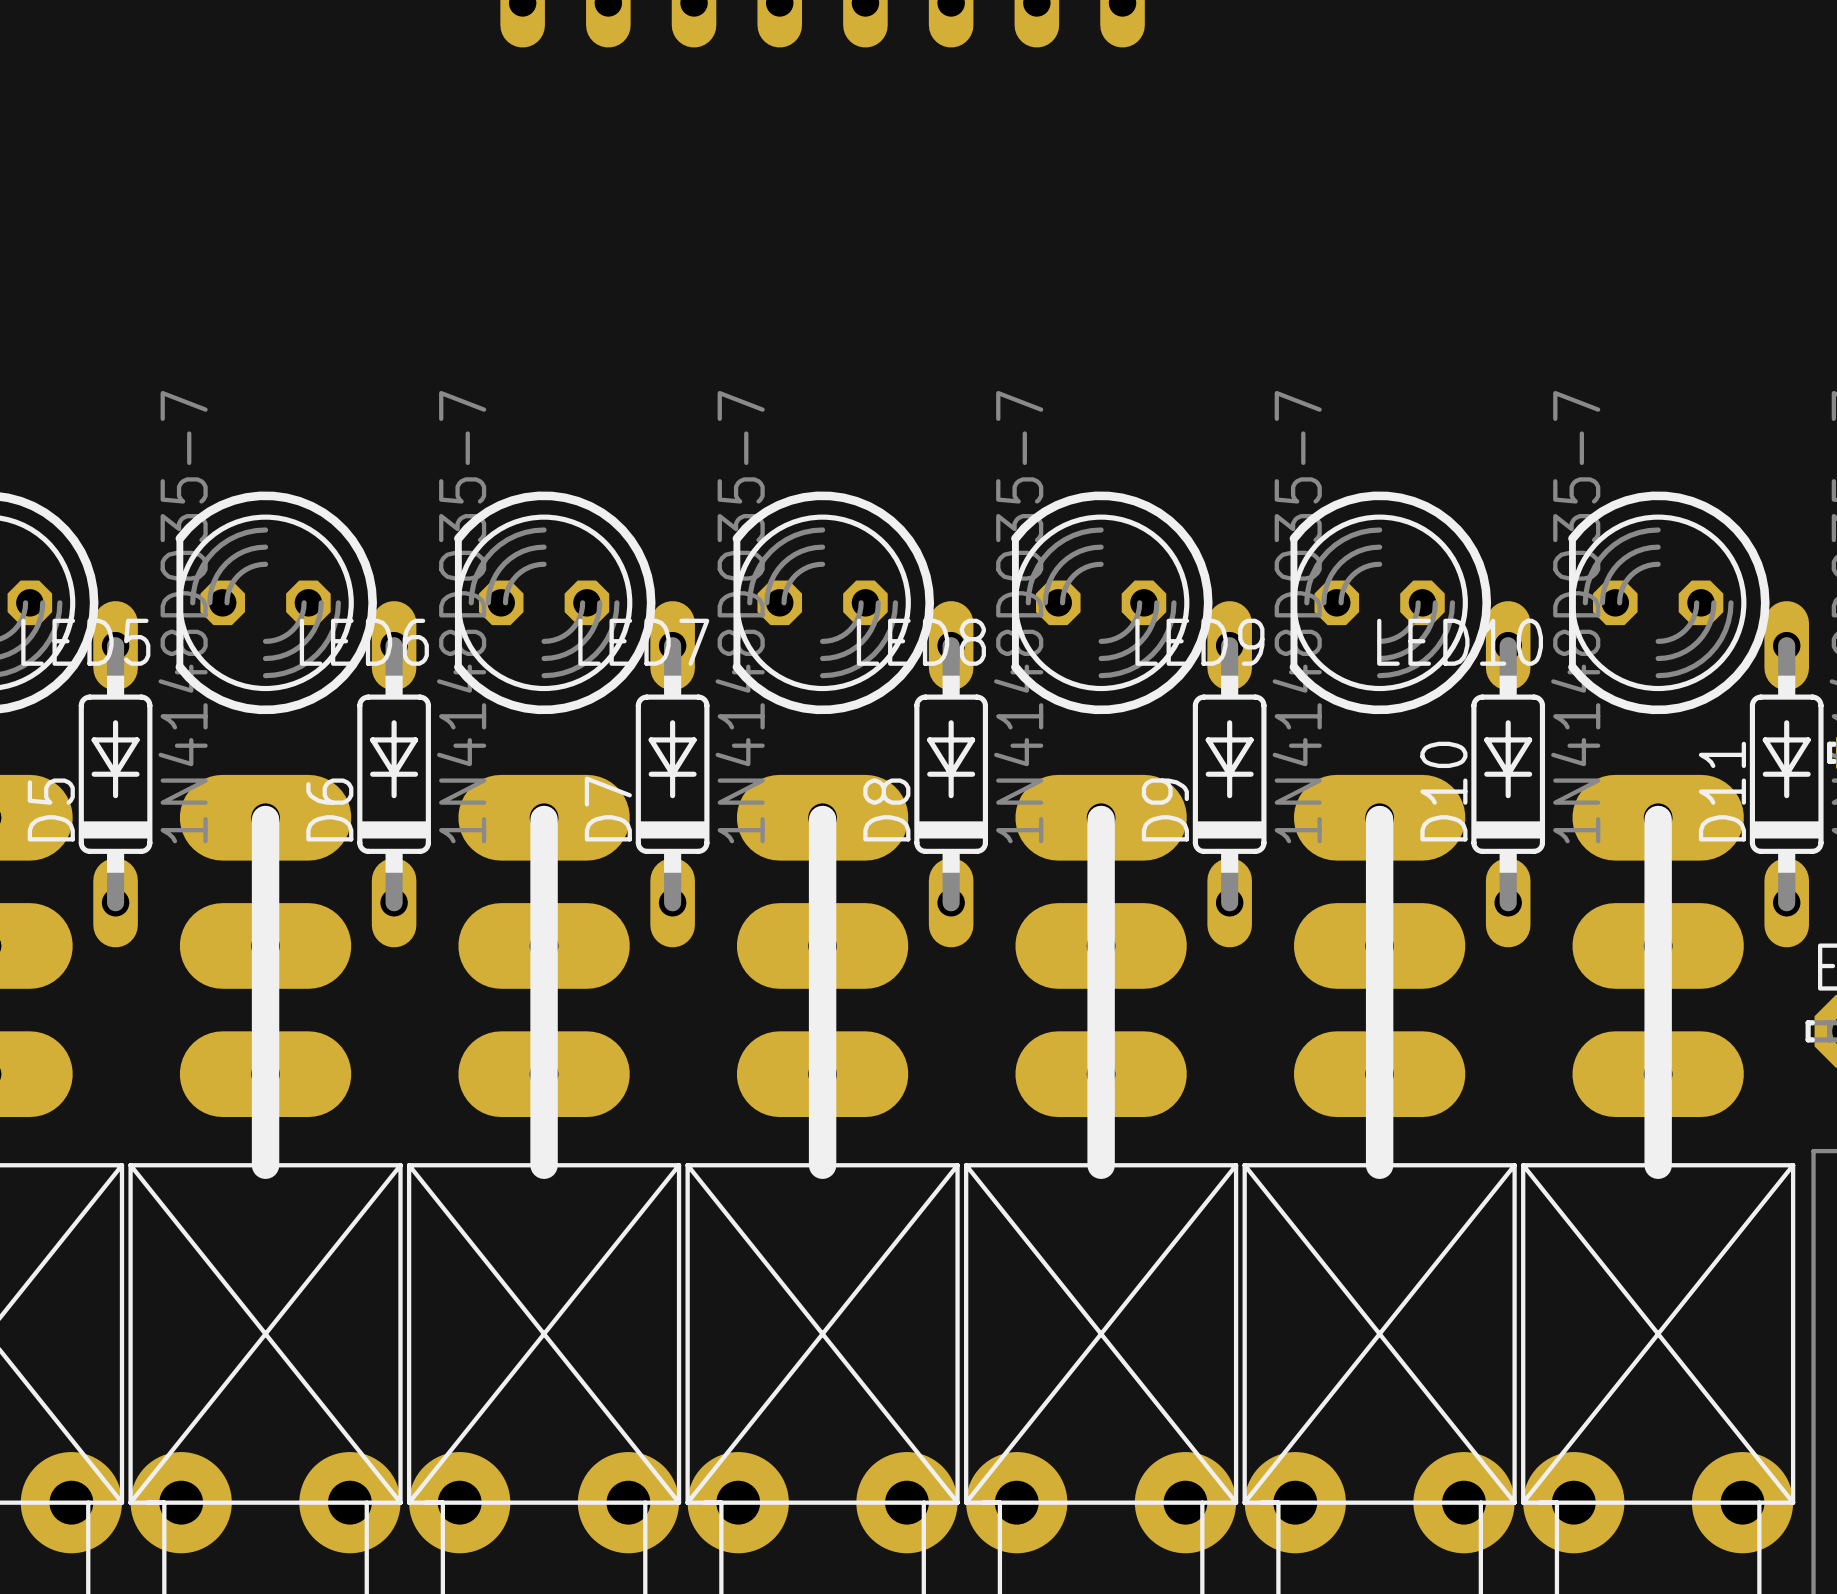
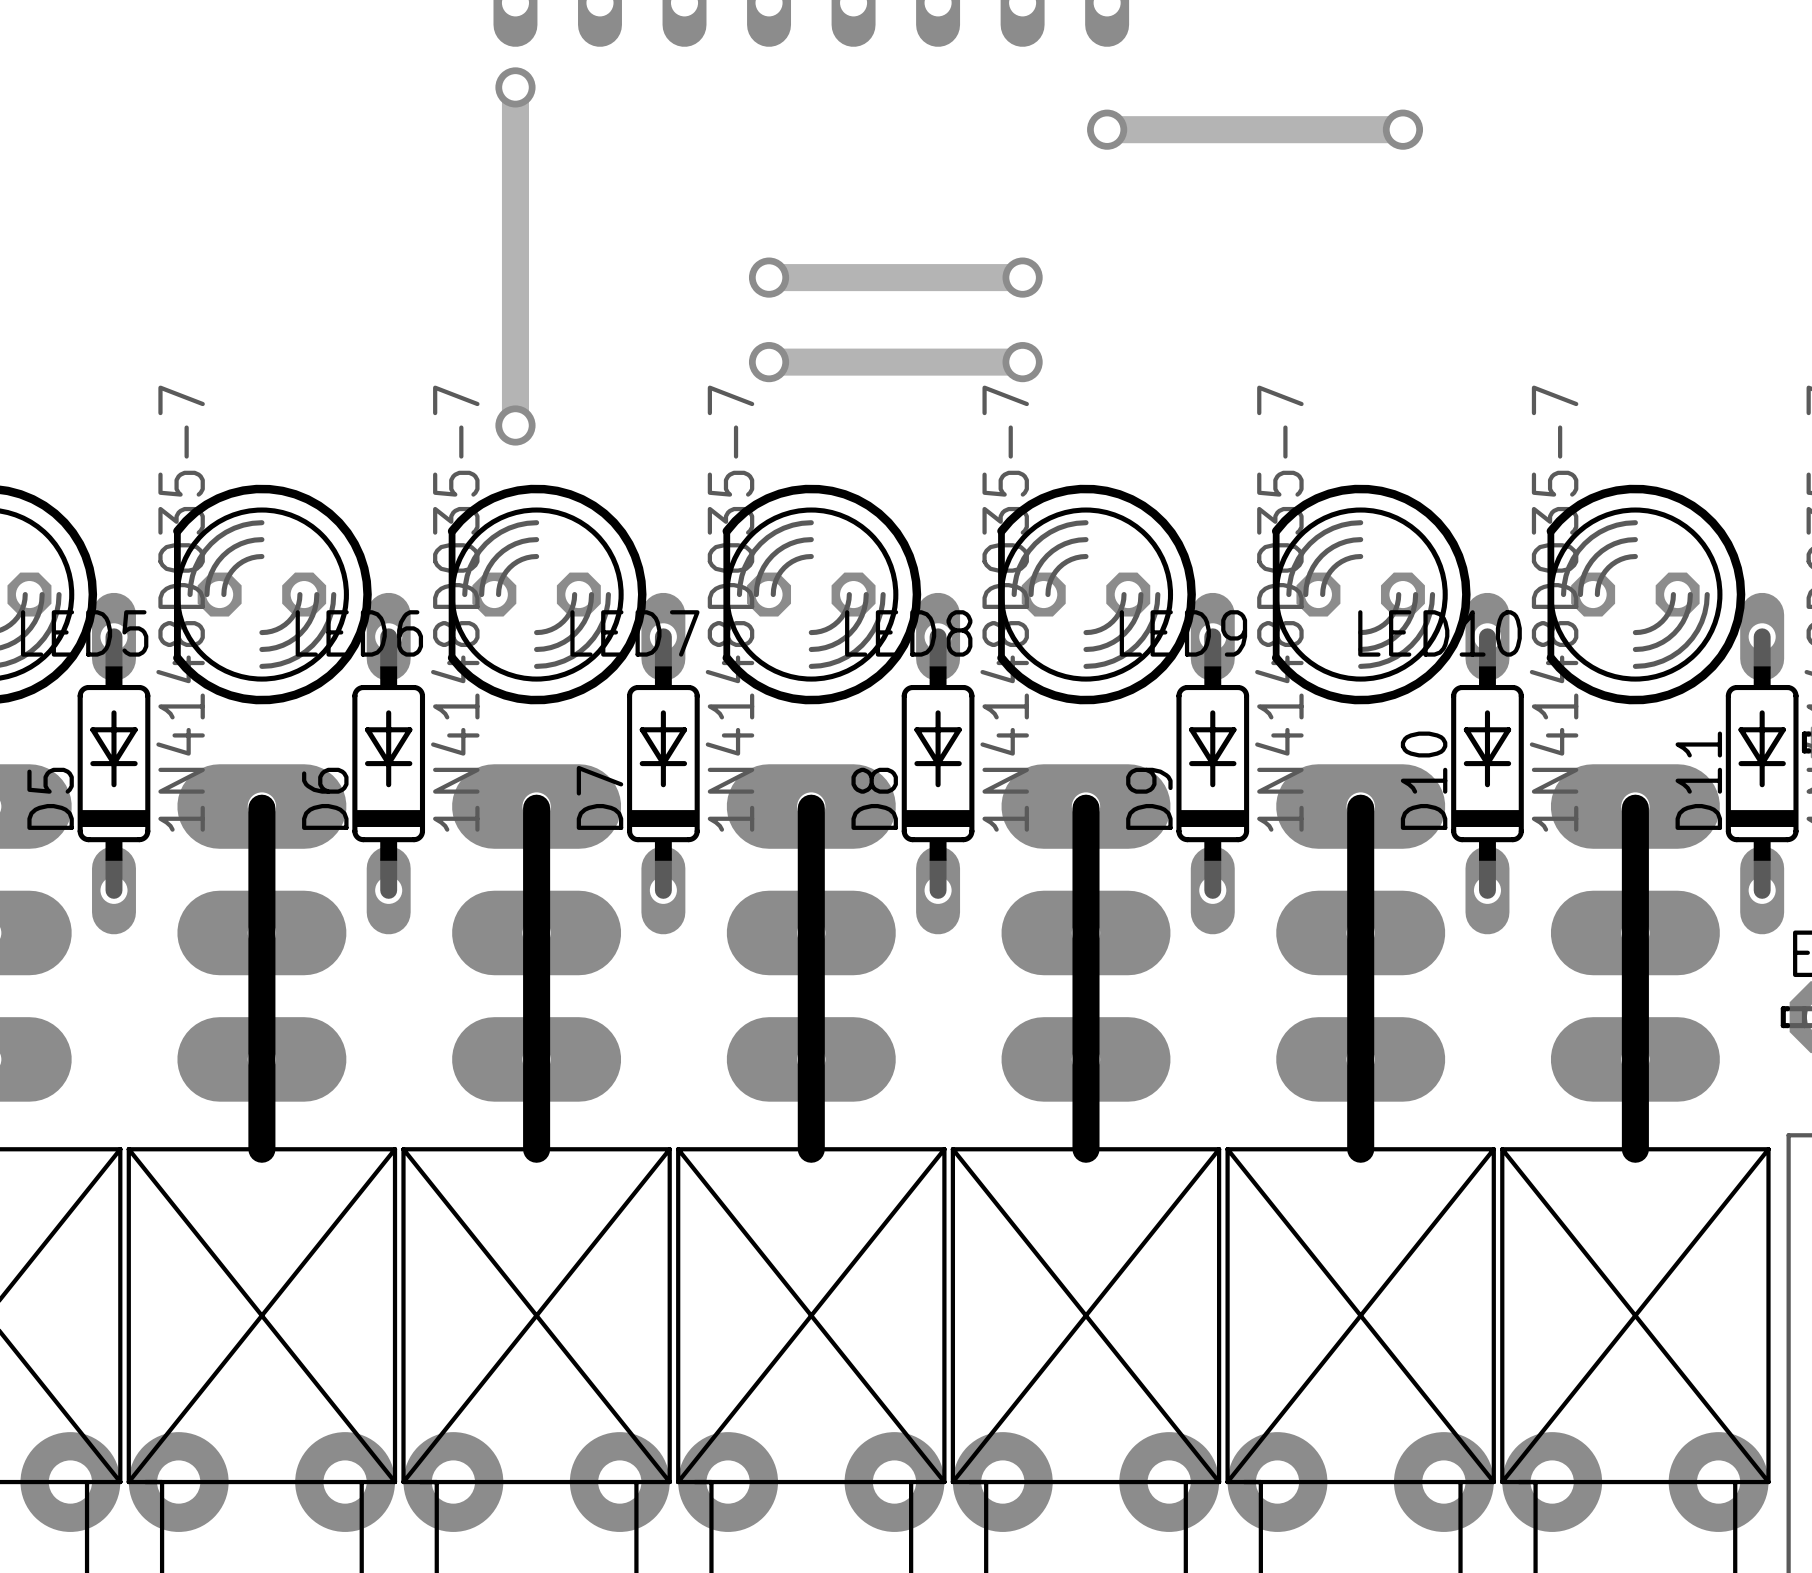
track: none -> (515, 87) (515, 425)
via: none -> (515, 87)
track: none -> (1107, 129) (1402, 129)
via: none -> (1107, 129)
via: none -> (1402, 129)
track: none -> (769, 277) (1022, 277)
via: none -> (769, 277)
via: none -> (1022, 277)
track: none -> (769, 362) (1022, 362)
via: none -> (769, 362)
via: none -> (1022, 362)
via: none -> (515, 425)

